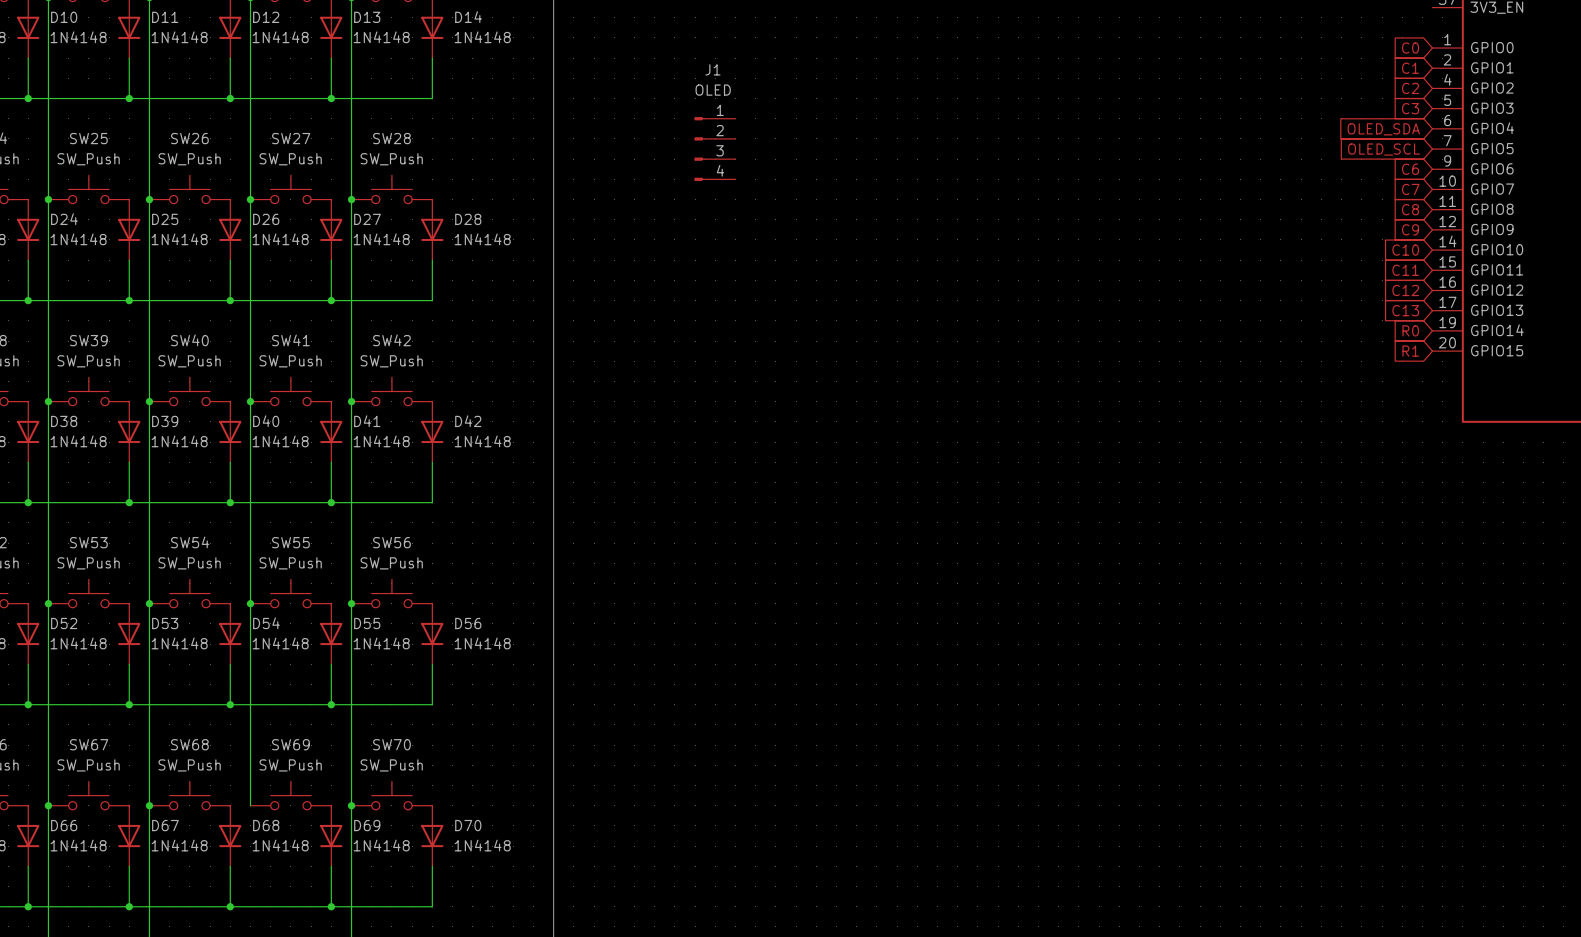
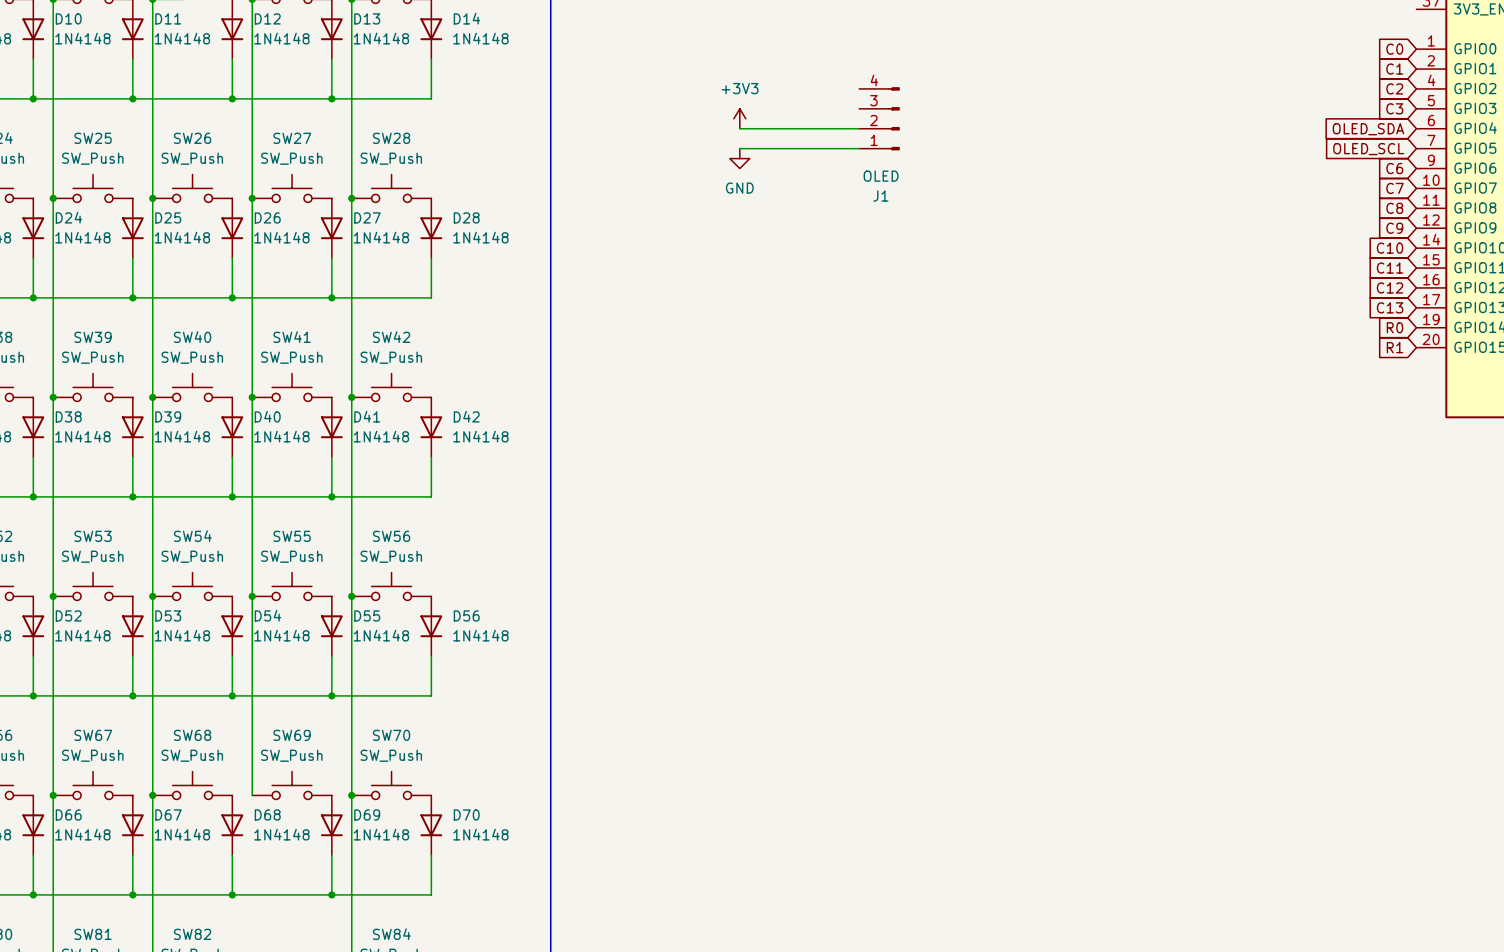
power symbol: none -> +3V3 (739, 118)
wire: none -> (739, 128) (859, 128)
J1 rotation: 0° (700, 149) -> 180° (894, 118)
J1 position: (714, 149) -> (879, 118)
wire: none -> (739, 148) (859, 148)
power symbol: none -> GND (739, 158)

